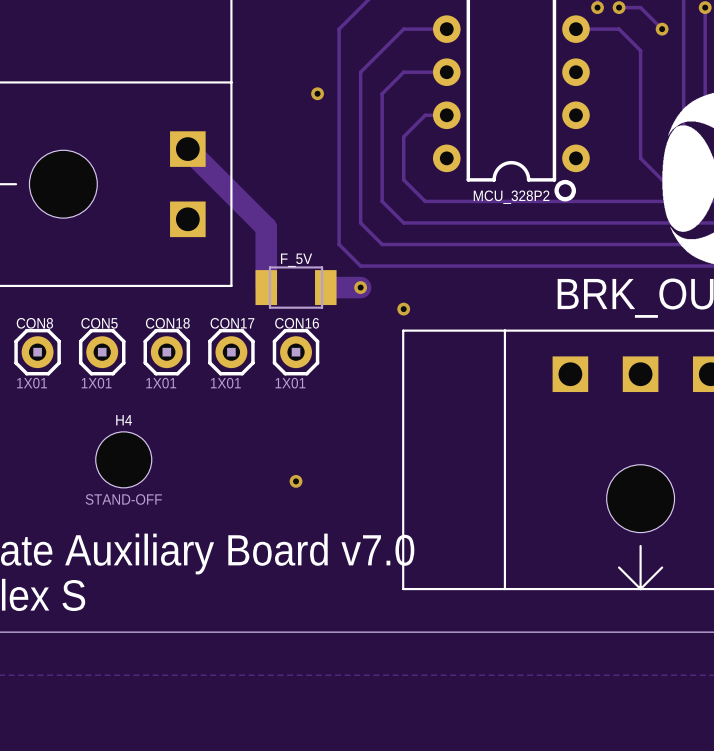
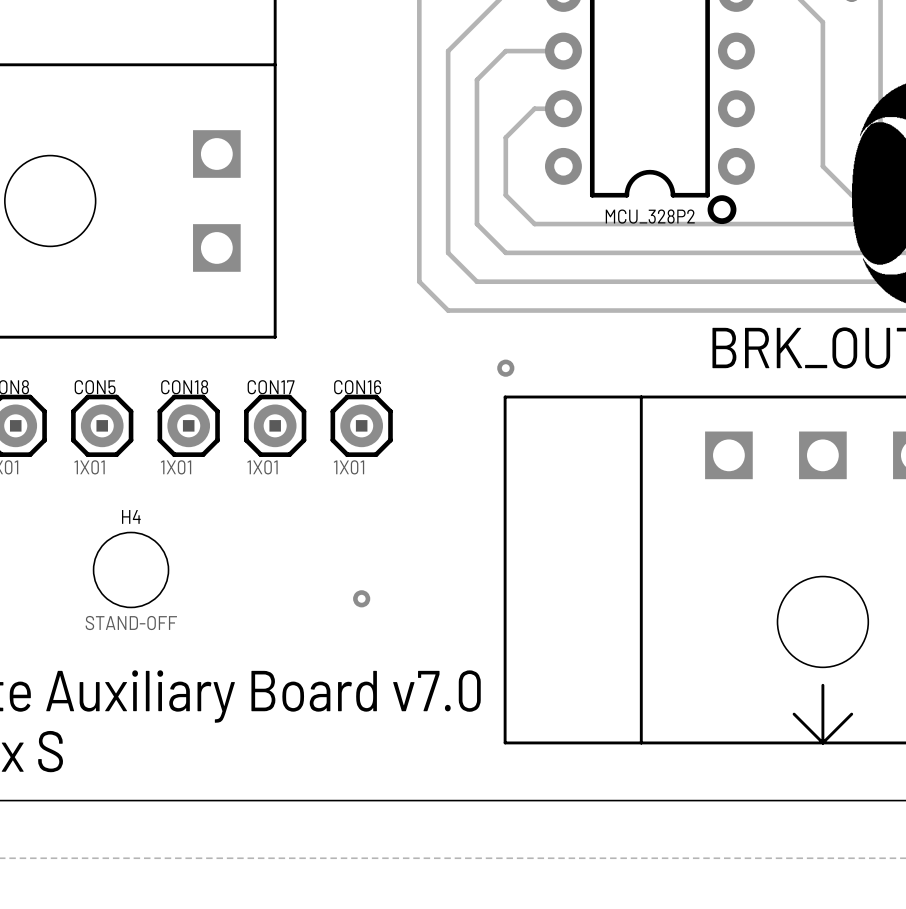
via: (317, 93) -> none
track: (187, 149) (266, 227) (266, 287) -> none
F_5V: (296, 287) -> none
track: (325, 287) (360, 287) -> none
via: (360, 287) -> none

